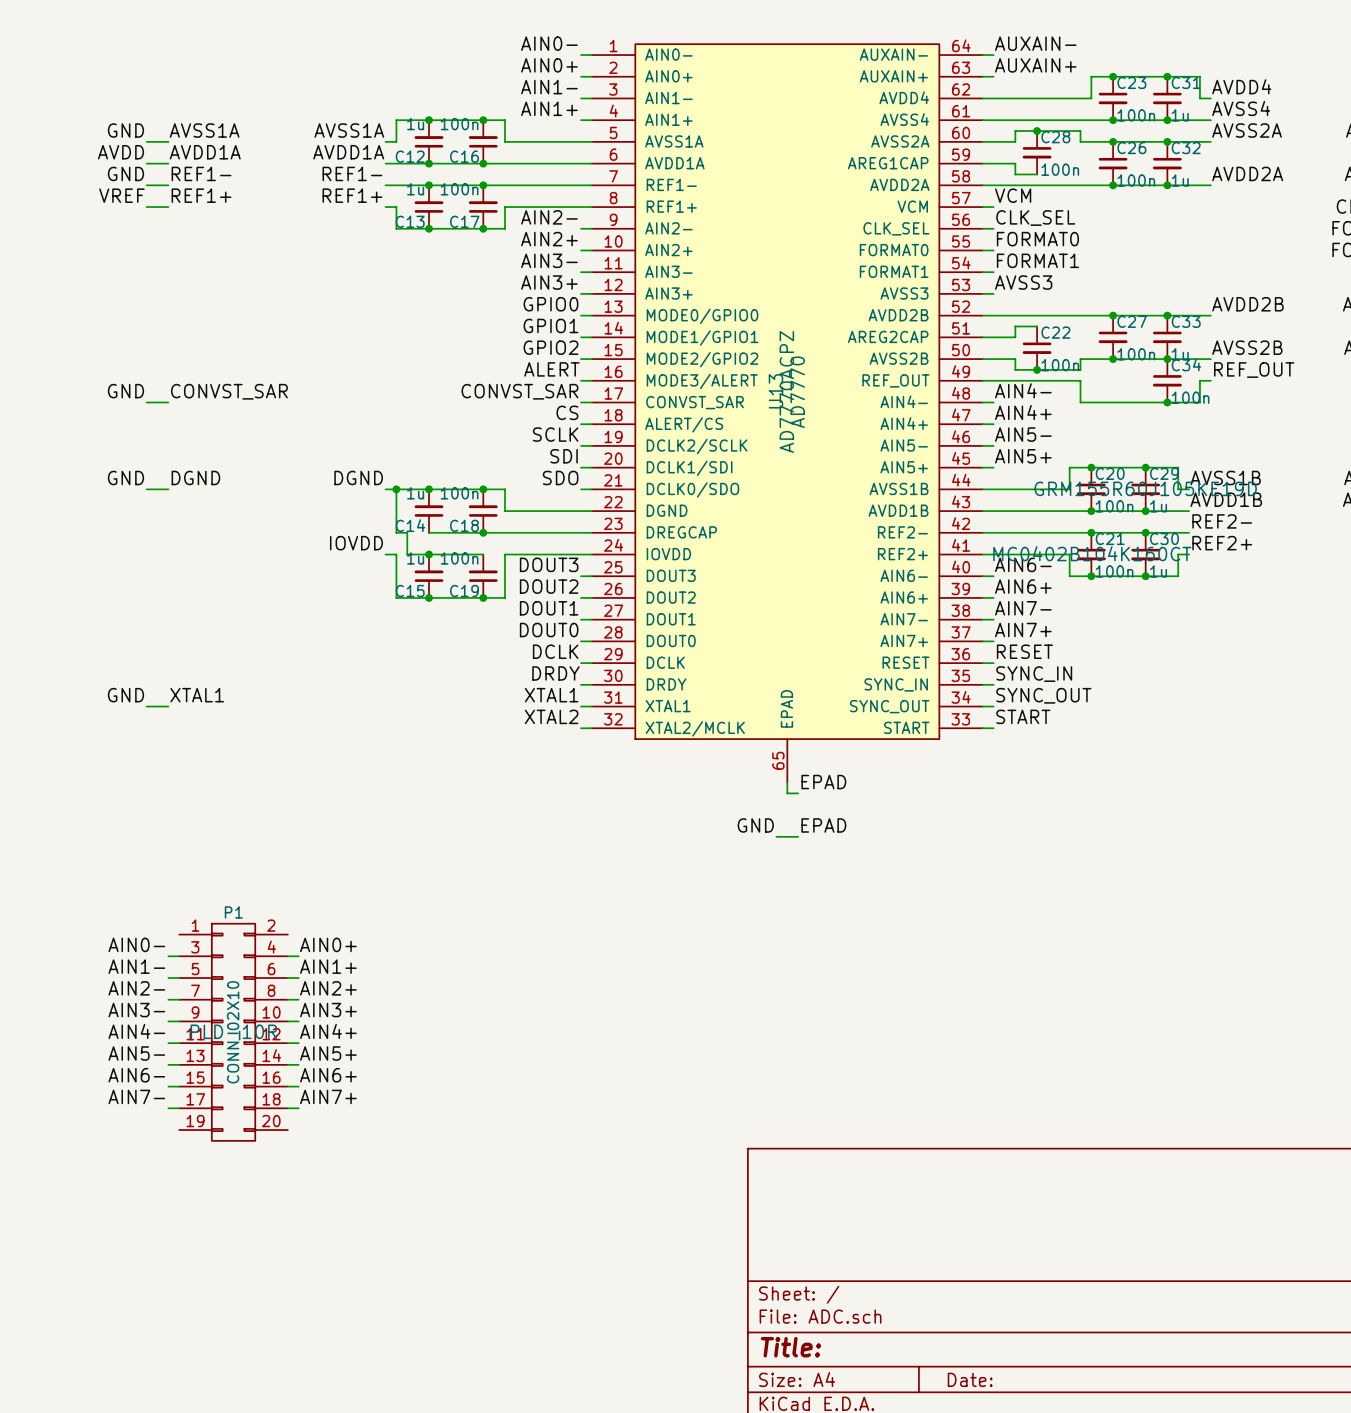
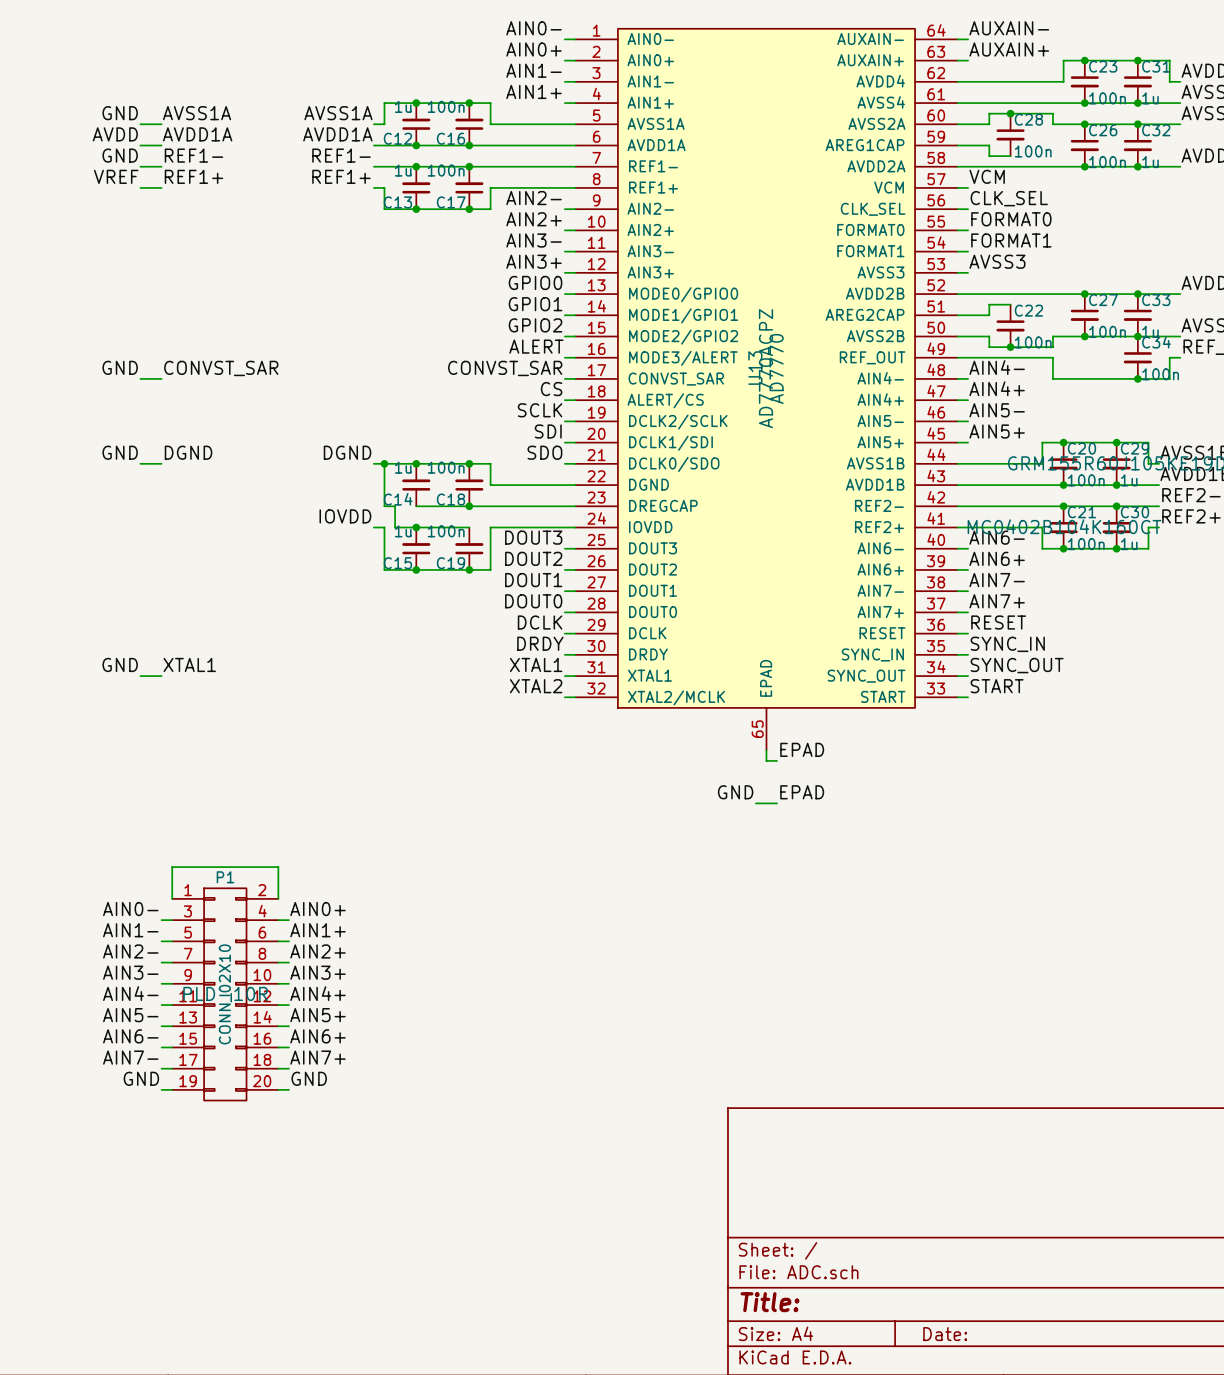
wire: none -> (172, 898) (172, 867) (278, 867) (278, 898)
label: none -> GND (141, 1078)
label: none -> GND (309, 1078)
wire: none -> (161, 1089) (172, 1089)
wire: none -> (278, 1089) (288, 1089)

